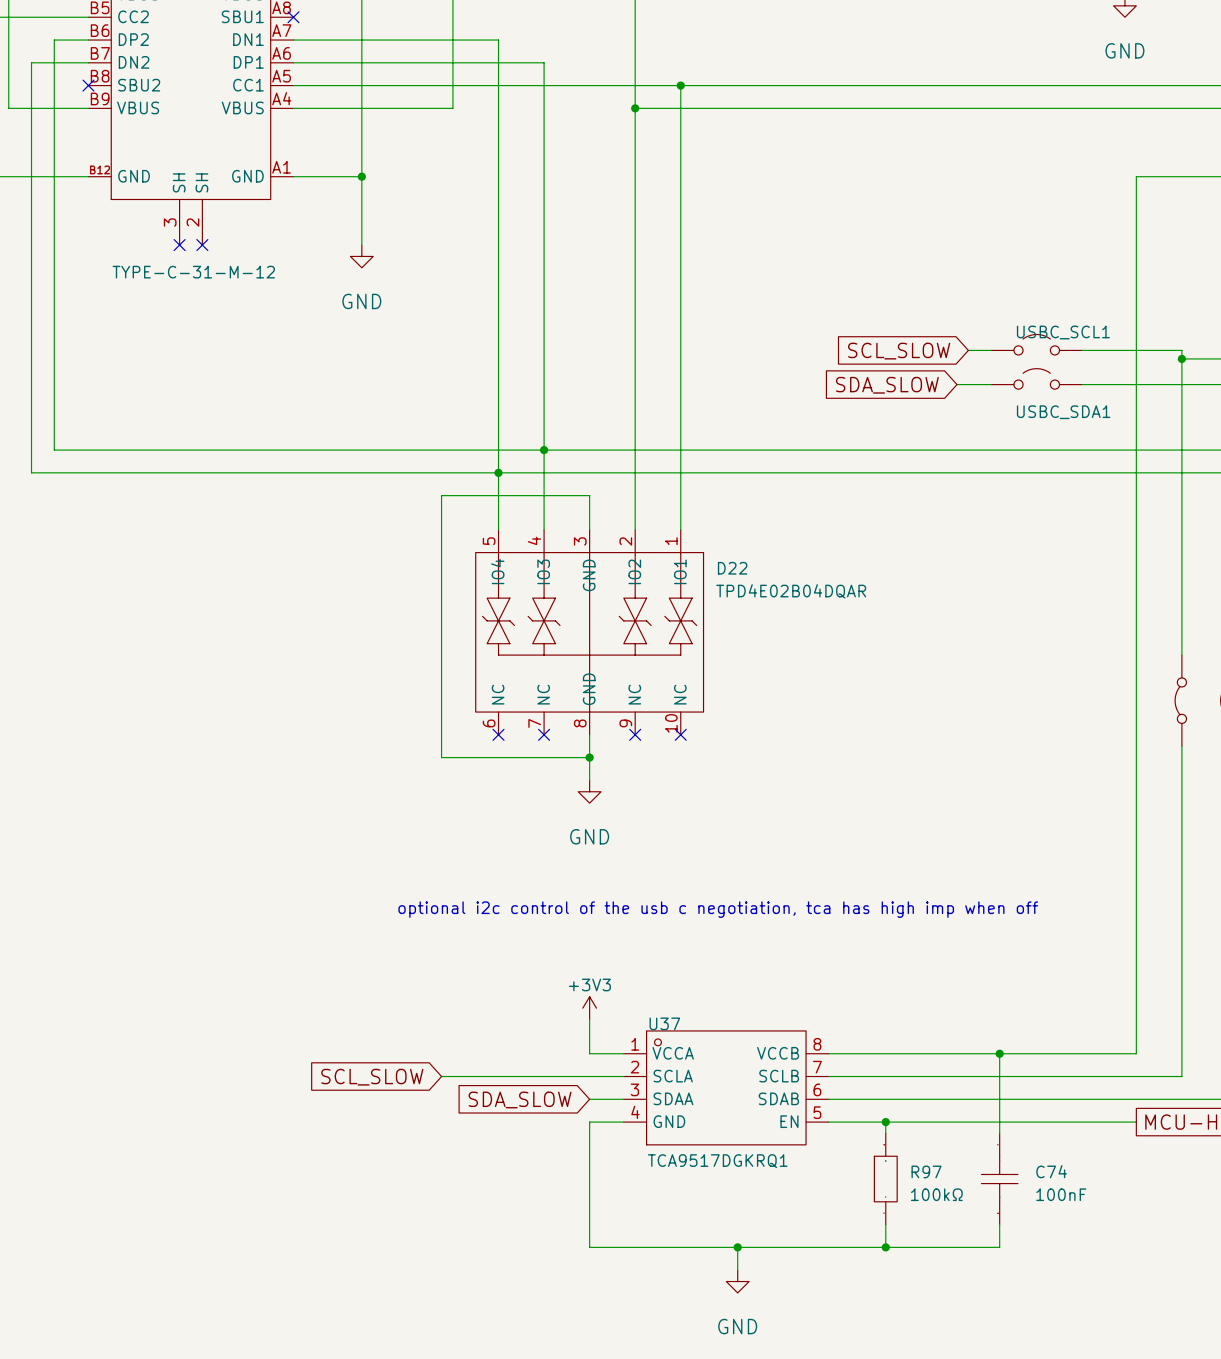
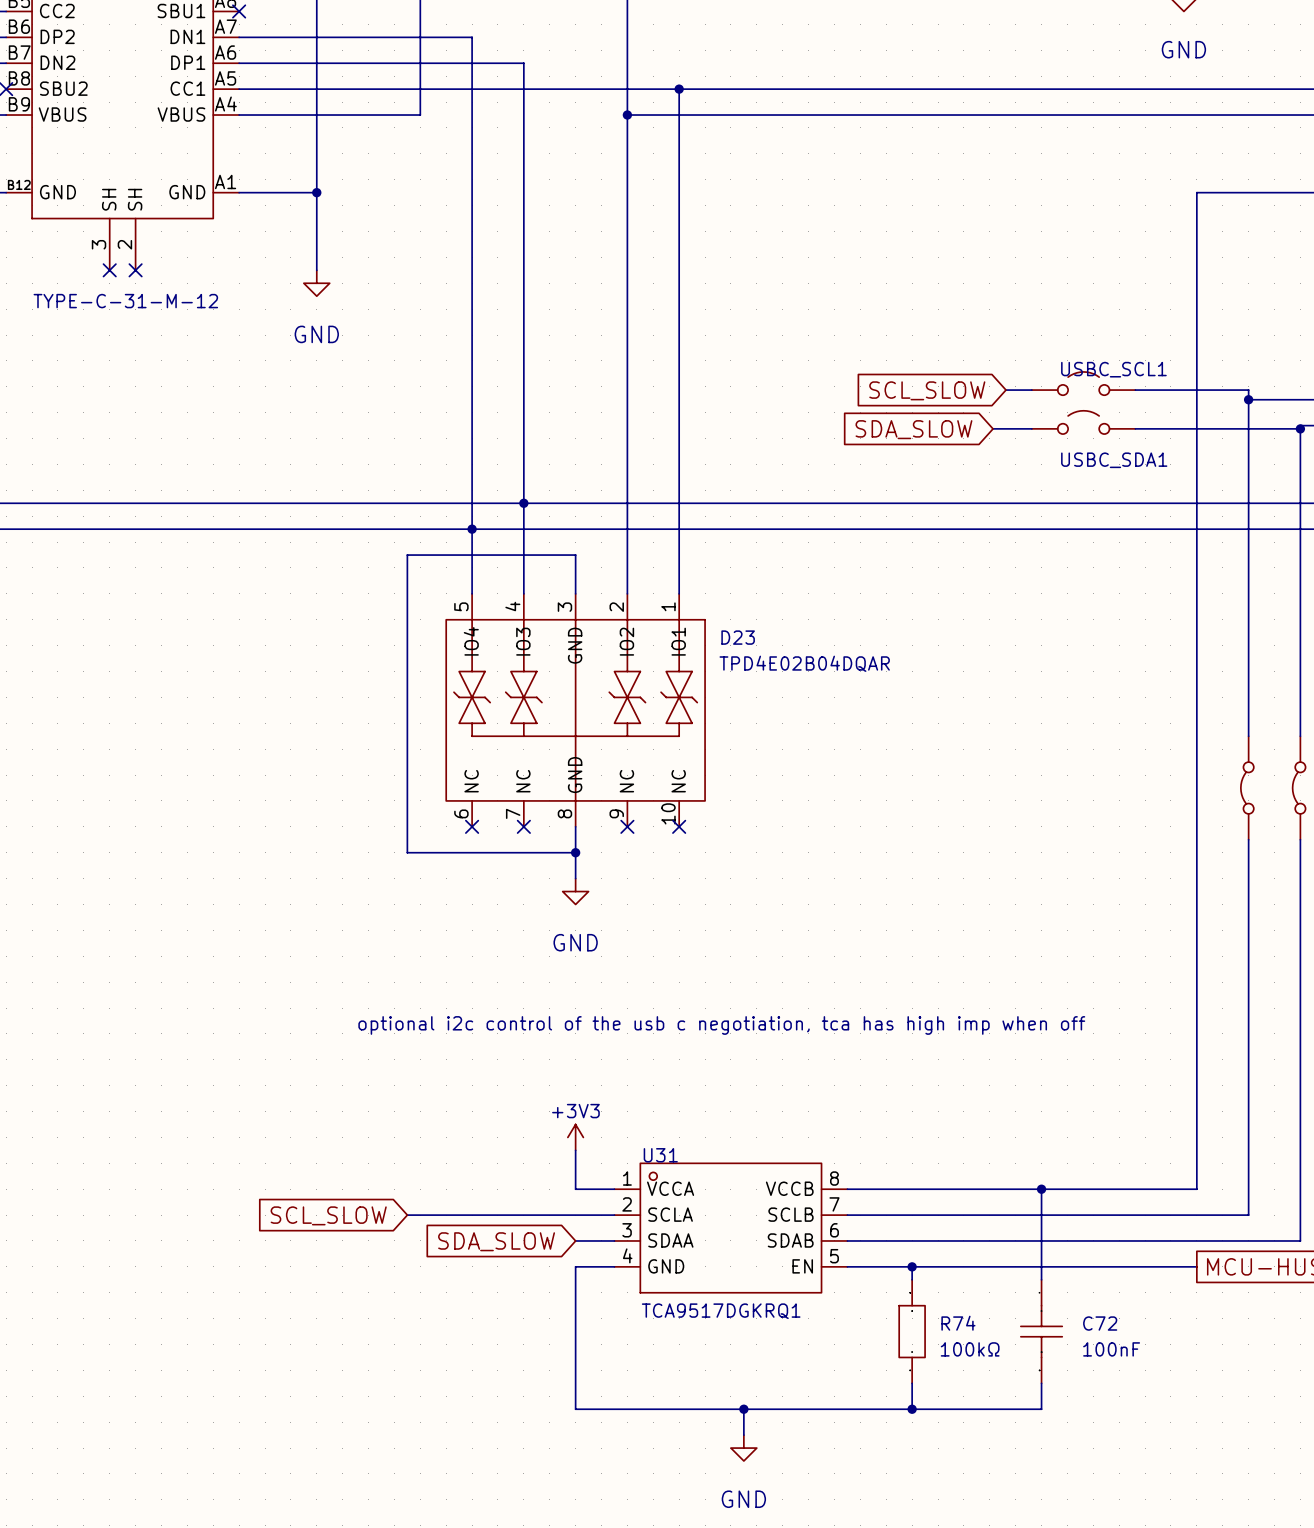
D22 name: D22 (732, 568) -> D23 (738, 637)
U37 name: U37 (664, 1023) -> U31 (660, 1155)
R97 name: R97 (926, 1171) -> R74 (958, 1323)
C74 name: C74 (1051, 1171) -> C72 (1100, 1323)

